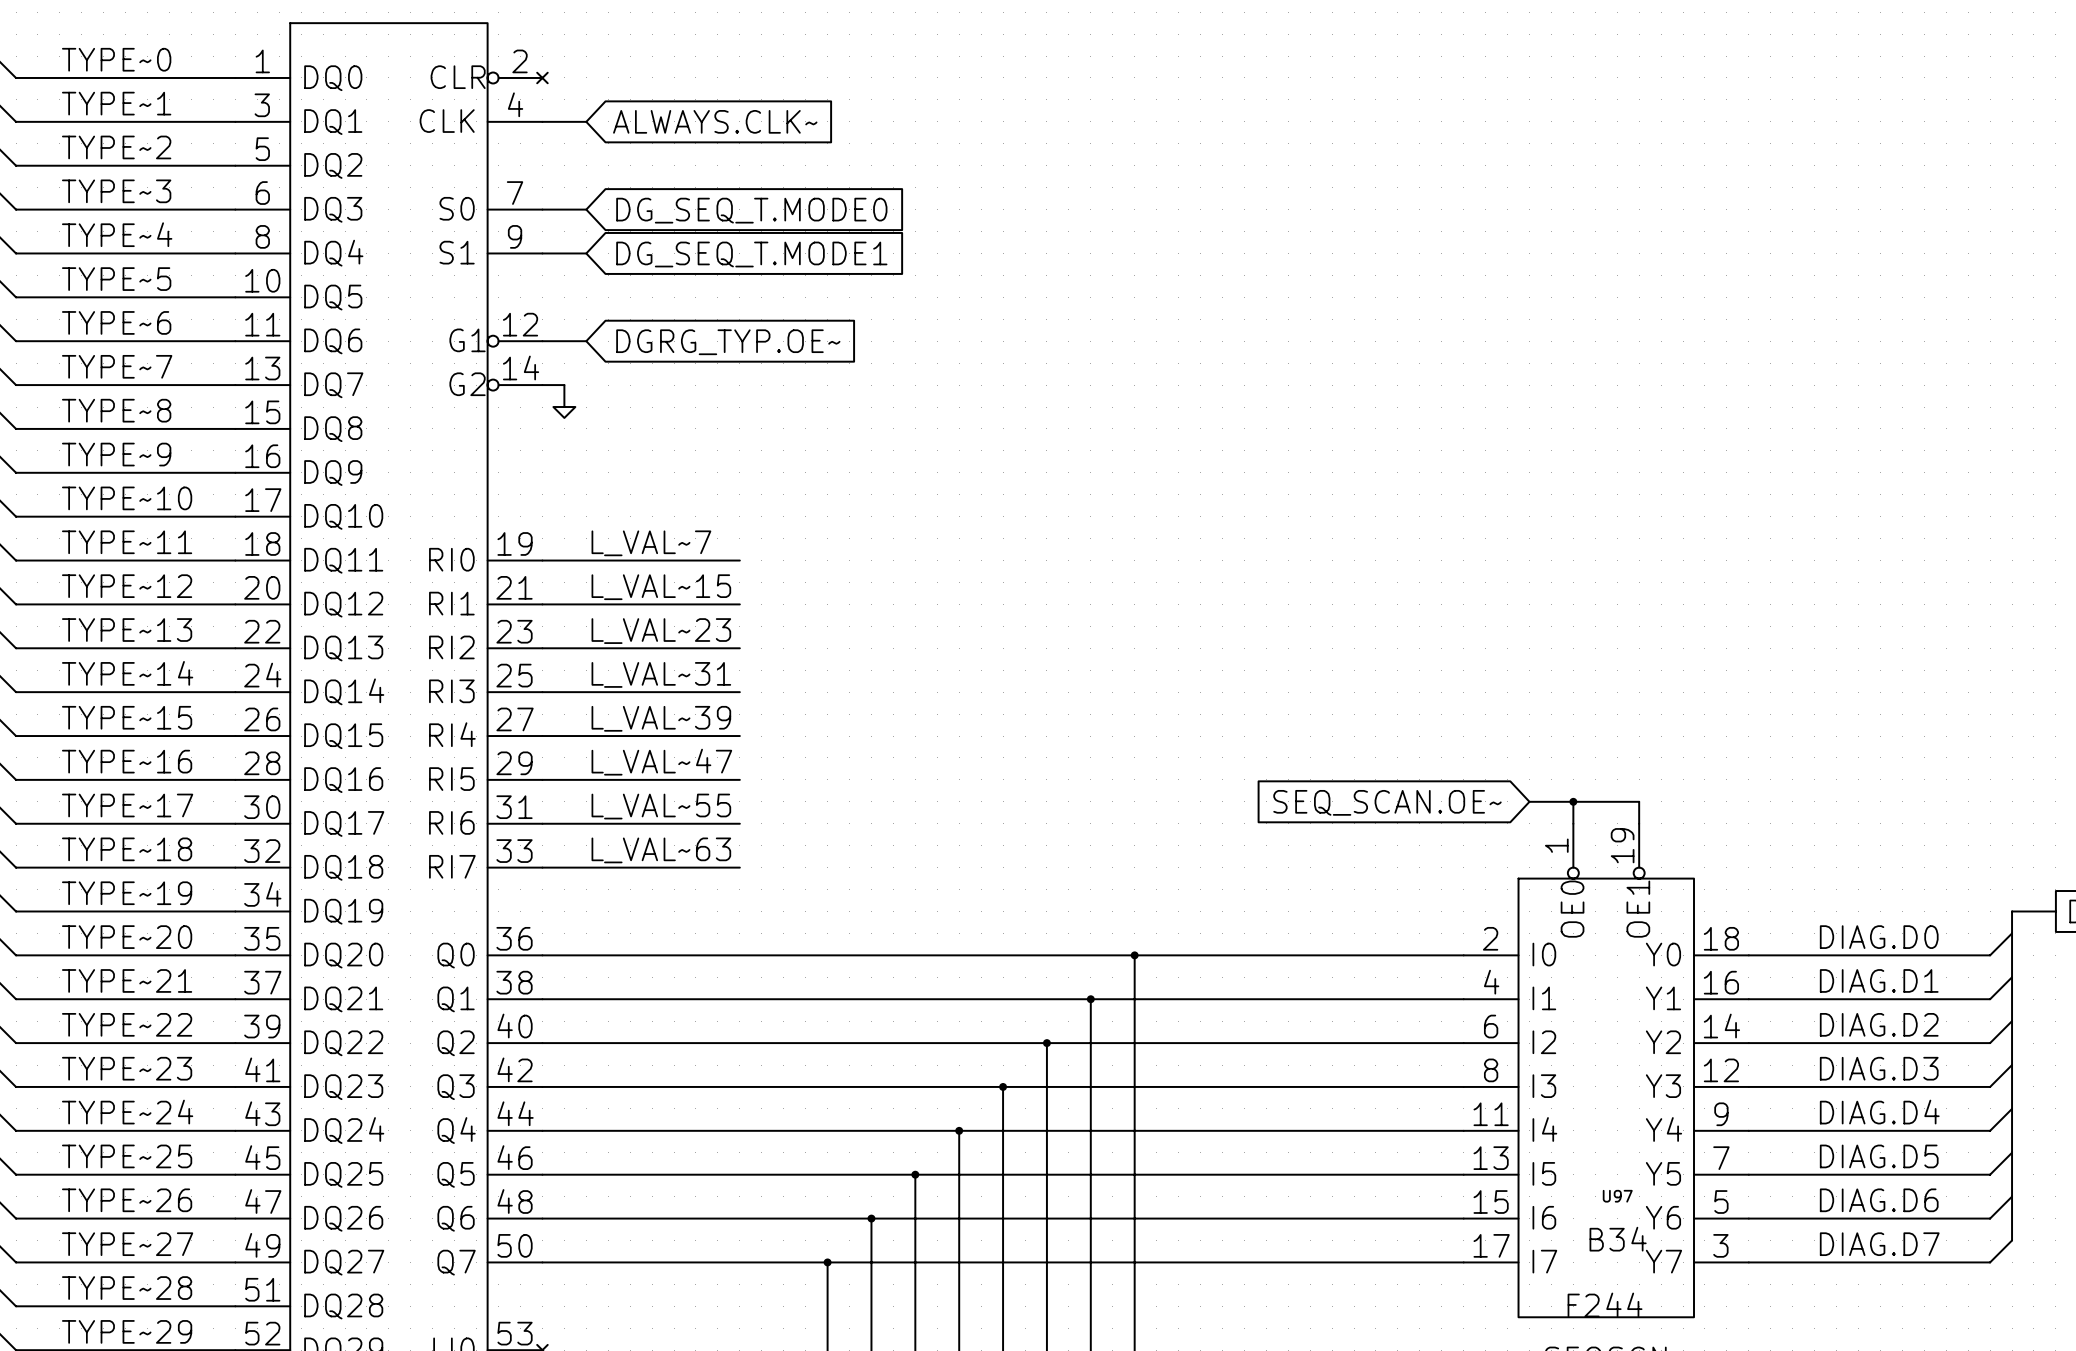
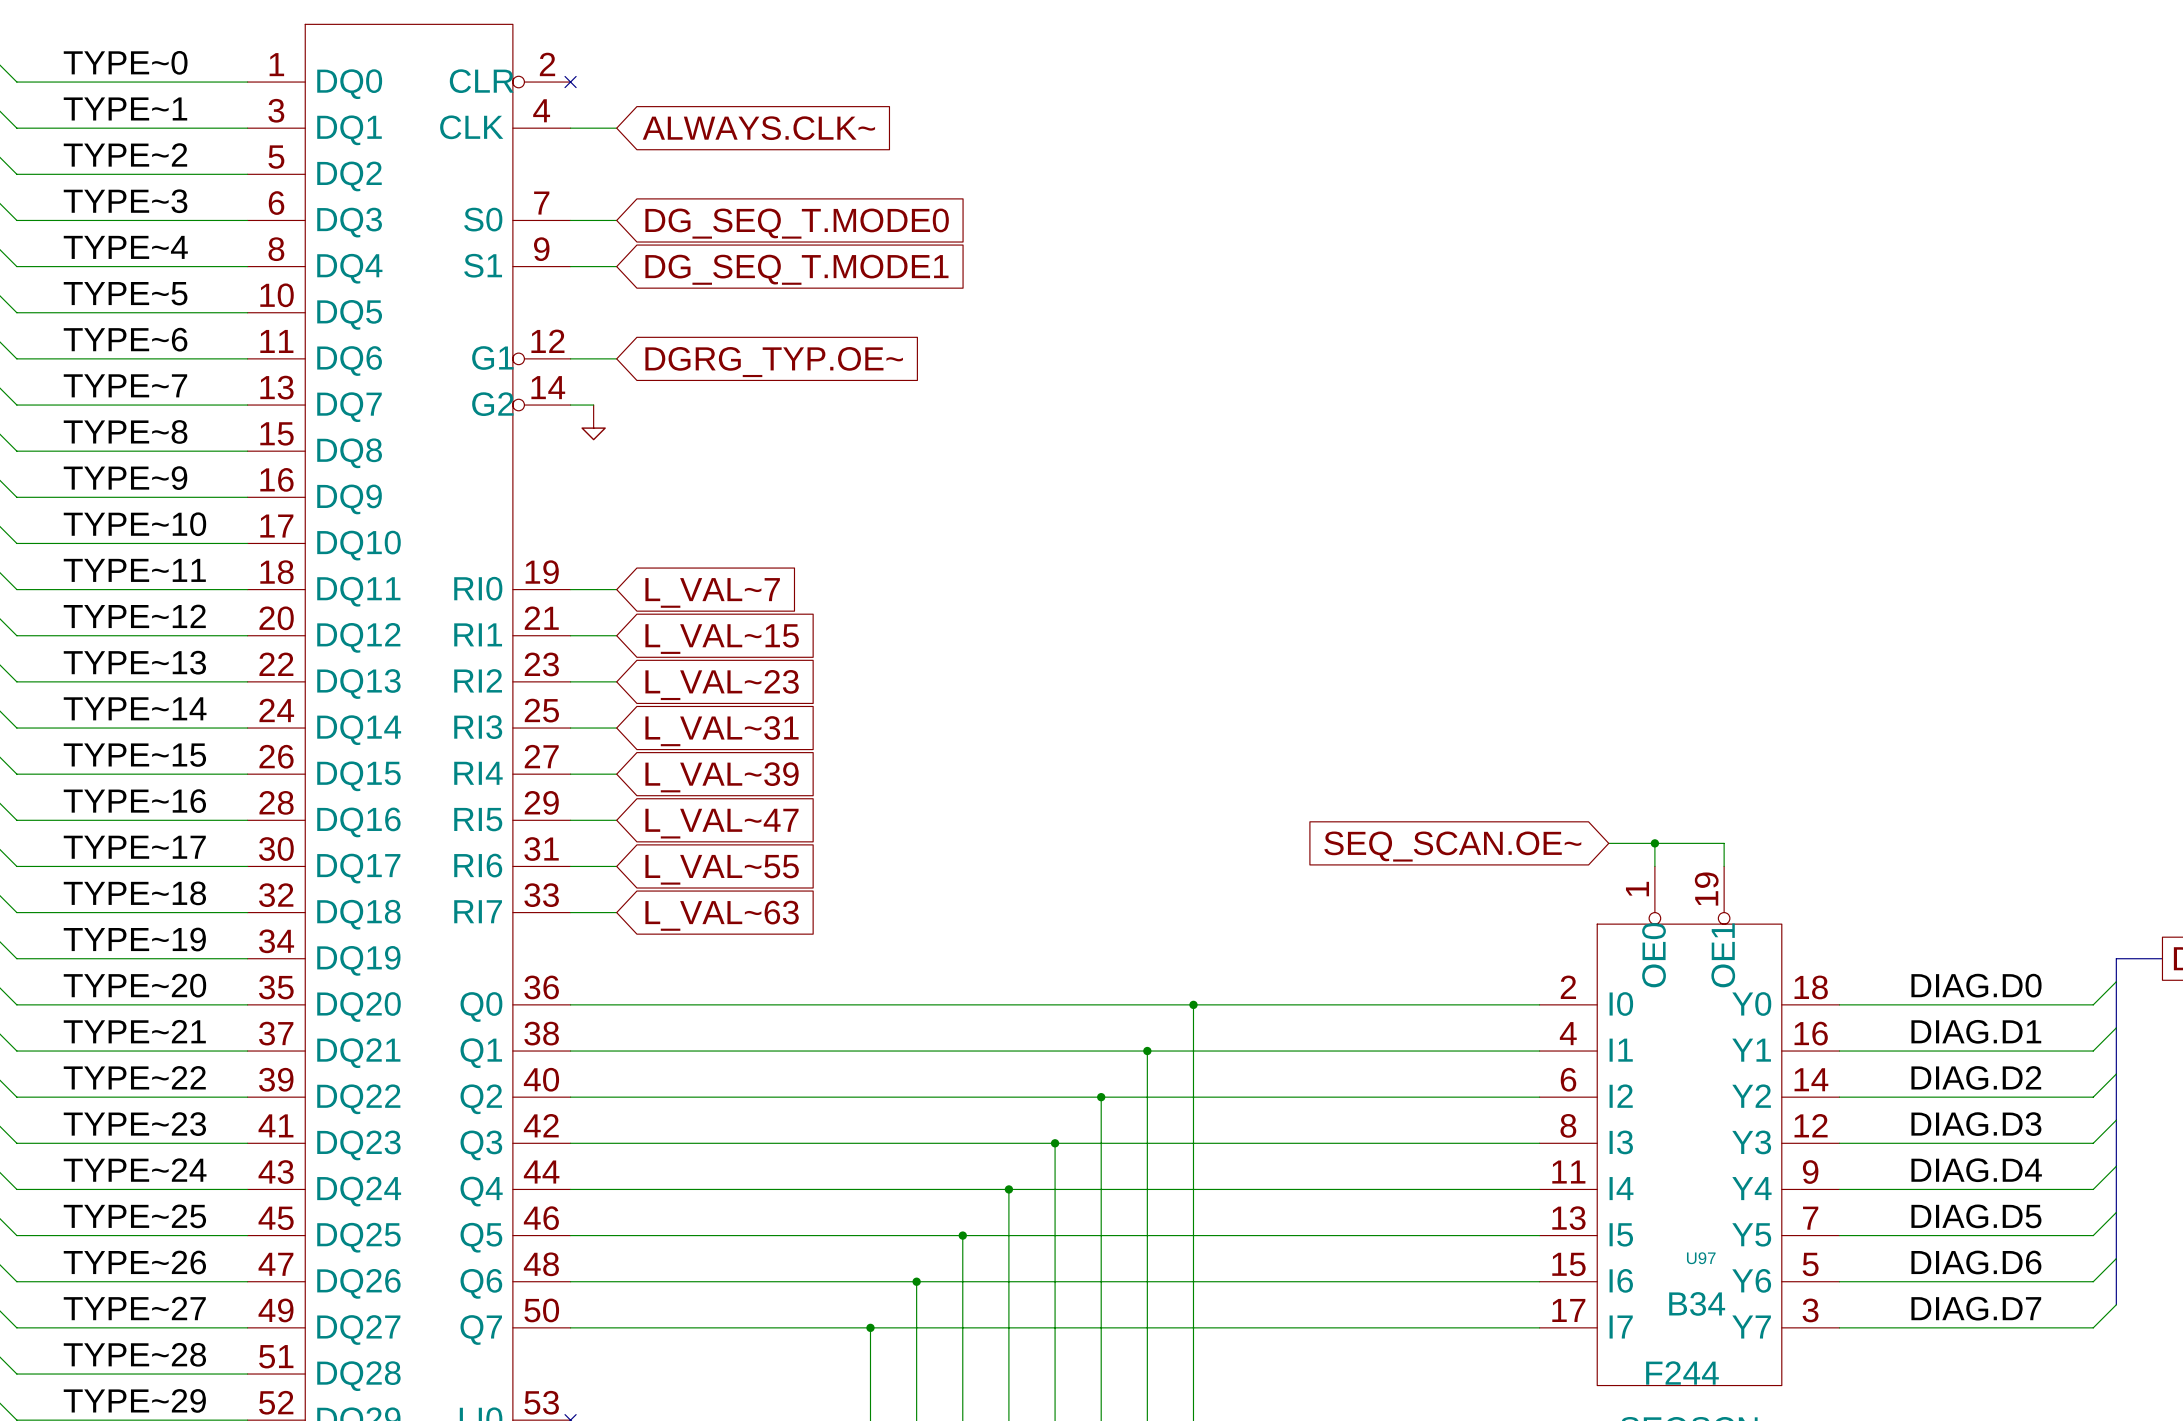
label: L_VAL~7 (651, 543) -> none
wire: (586, 560) (739, 560) -> none
global label: none -> L_VAL~7 (712, 592)
label: L_VAL~15 (661, 587) -> none
wire: (586, 604) (739, 604) -> none
global label: none -> L_VAL~15 (722, 639)
label: L_VAL~23 (661, 631) -> none
wire: (586, 648) (739, 648) -> none
global label: none -> L_VAL~23 (722, 685)
label: L_VAL~31 (661, 674) -> none
wire: (586, 692) (739, 692) -> none
global label: none -> L_VAL~31 (722, 731)
label: L_VAL~39 (661, 718) -> none
wire: (586, 736) (739, 736) -> none
global label: none -> L_VAL~39 (722, 777)
label: L_VAL~47 (661, 762) -> none
wire: (586, 779) (739, 779) -> none
global label: none -> L_VAL~47 (721, 823)
label: L_VAL~55 (661, 806) -> none
wire: (586, 823) (739, 823) -> none
global label: none -> L_VAL~55 (722, 869)
label: L_VAL~63 (661, 850) -> none
wire: (586, 867) (739, 867) -> none
global label: none -> L_VAL~63 (722, 915)

